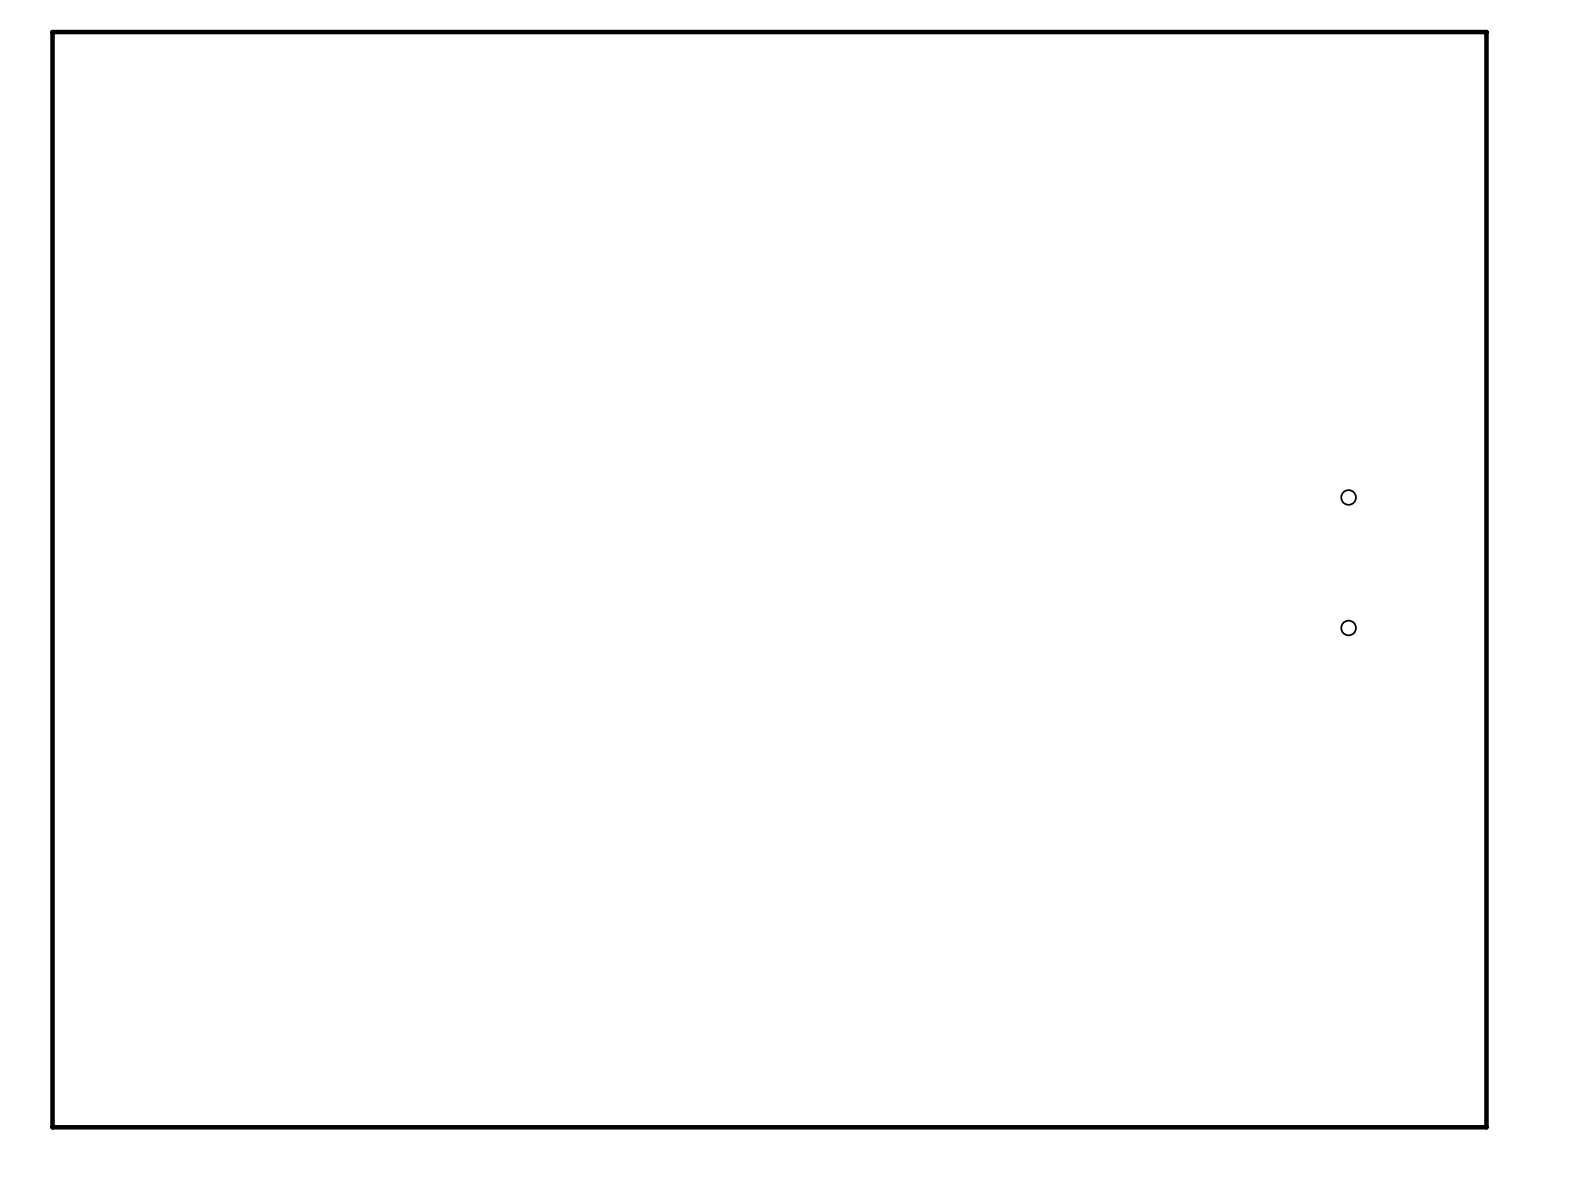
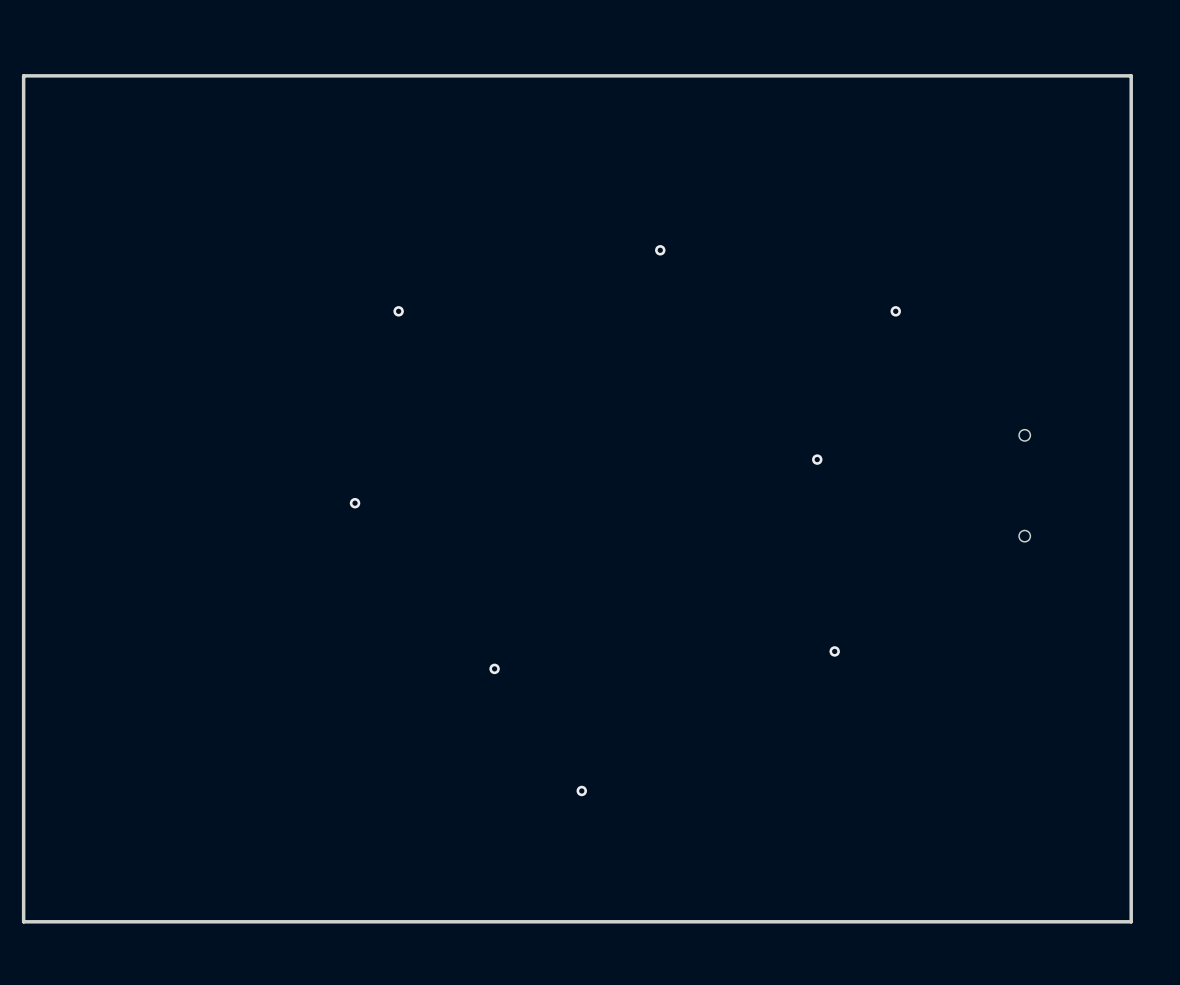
via: none -> (660, 250)
via: none -> (398, 311)
via: none -> (895, 311)
via: none -> (817, 459)
via: none -> (355, 503)
via: none -> (834, 651)
via: none -> (494, 668)
via: none -> (581, 790)

